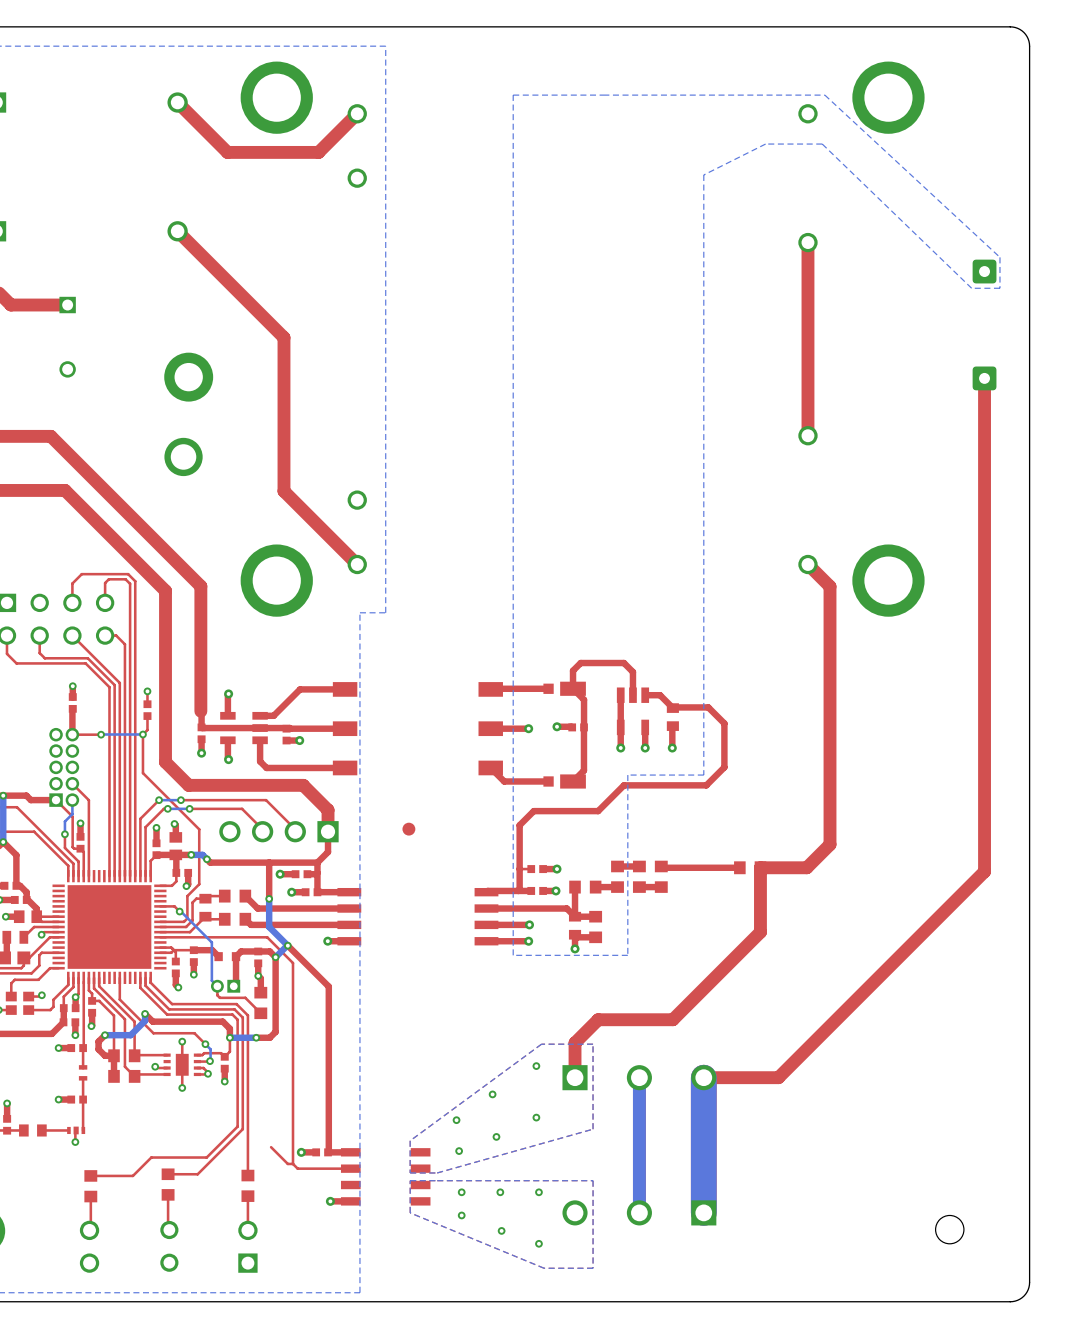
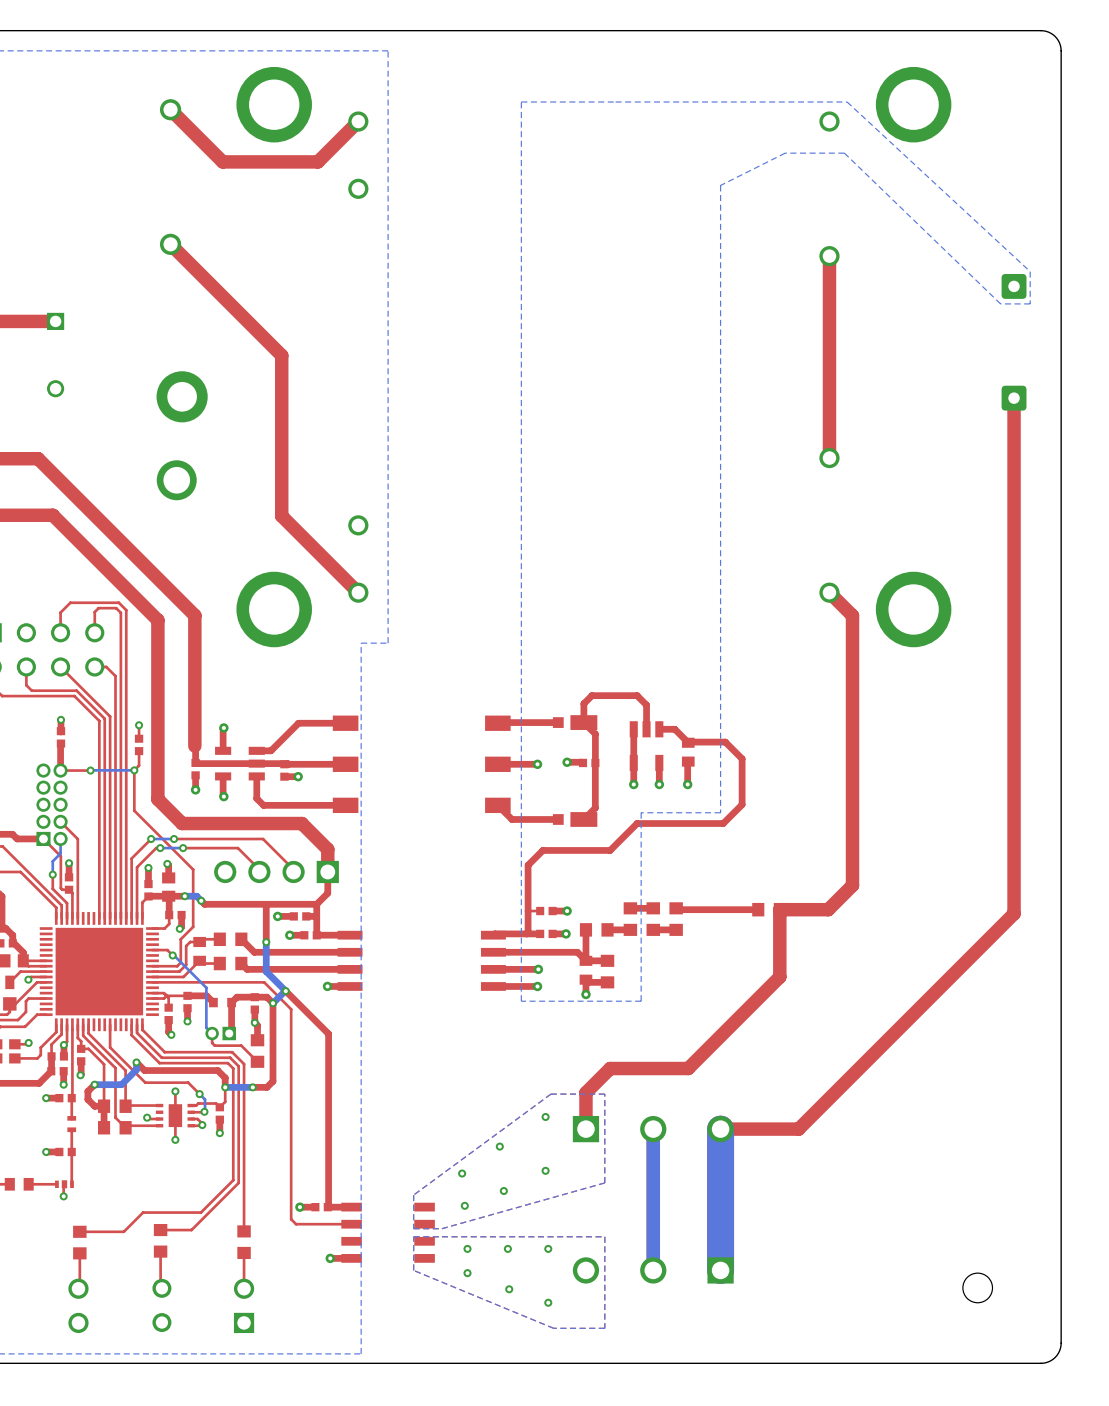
part: (408, 829) -> none
top track: (271, 1147) (287, 1163) (293, 1163) -> none

